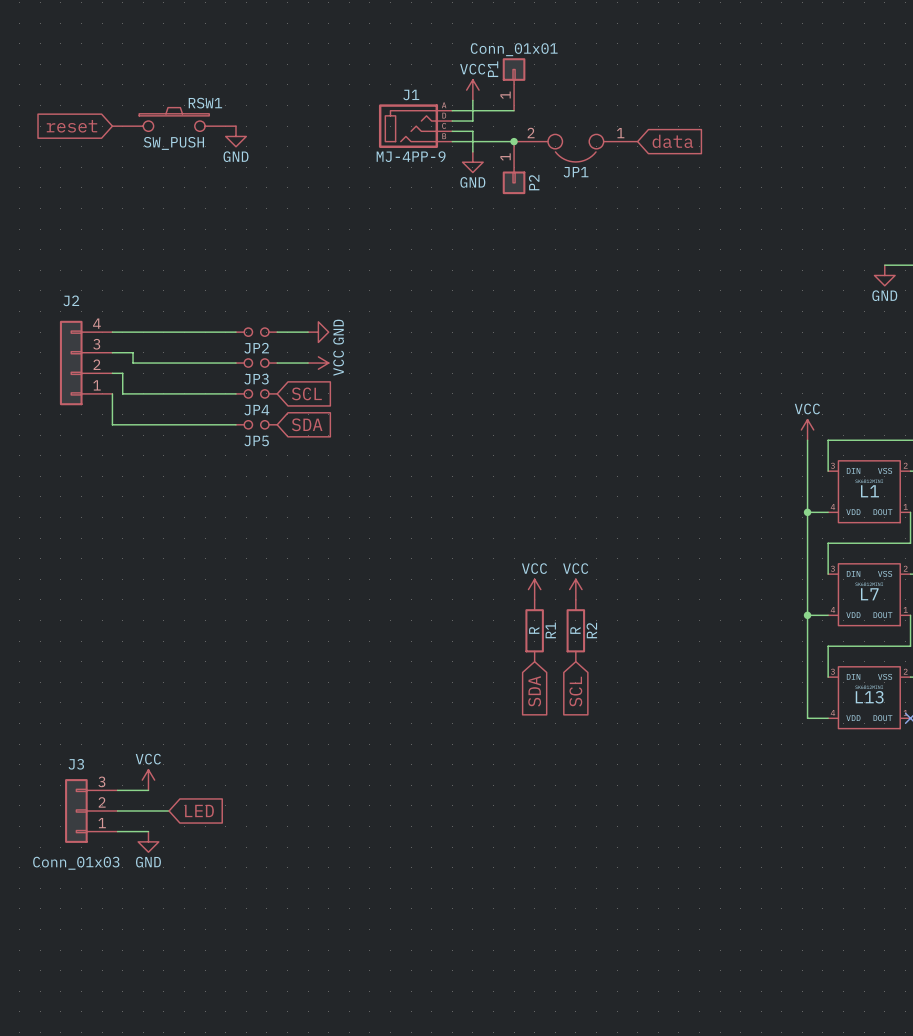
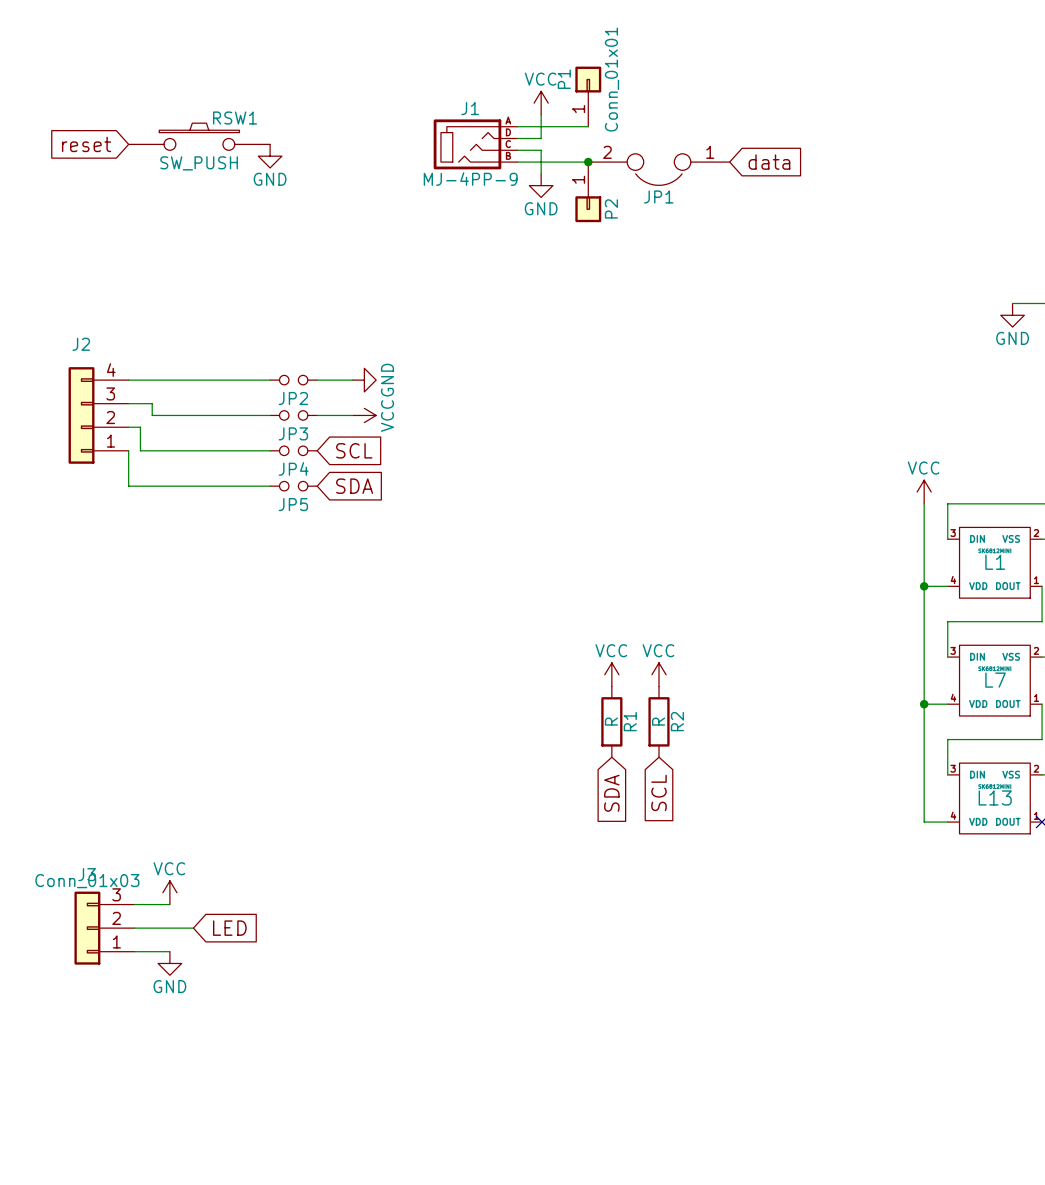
P1 value rotation: 0° (514, 49) -> 90° counterclockwise (611, 79)
J3 value position: Conn_01x03 (76, 863) -> Conn_01x03 (87, 881)

